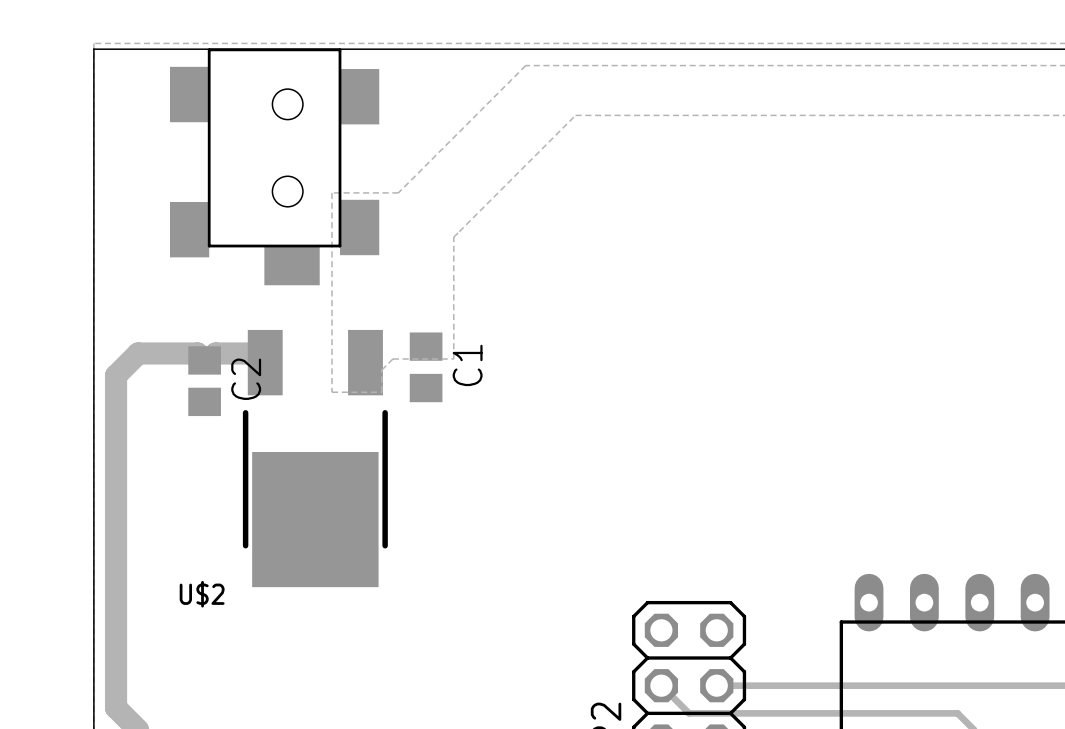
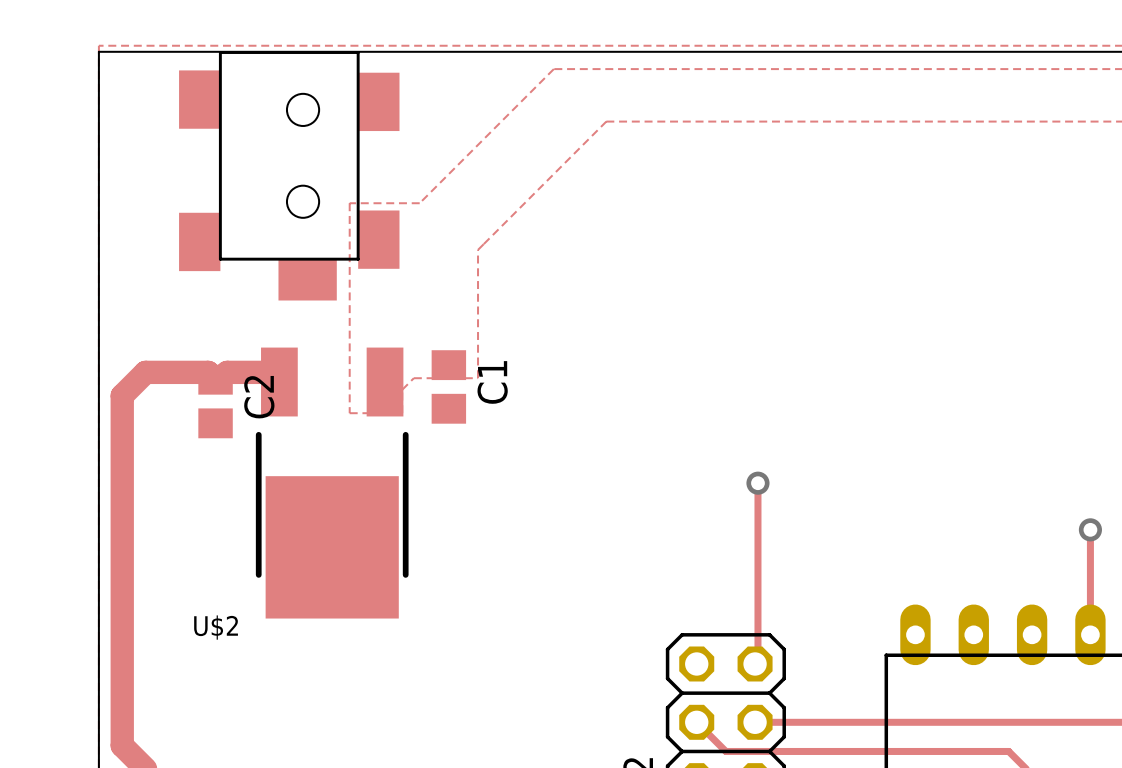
track: none -> (757, 483) (757, 661) (755, 663)
via: none -> (757, 483)
track: none -> (1090, 529) (1090, 634)
via: none -> (1090, 529)

